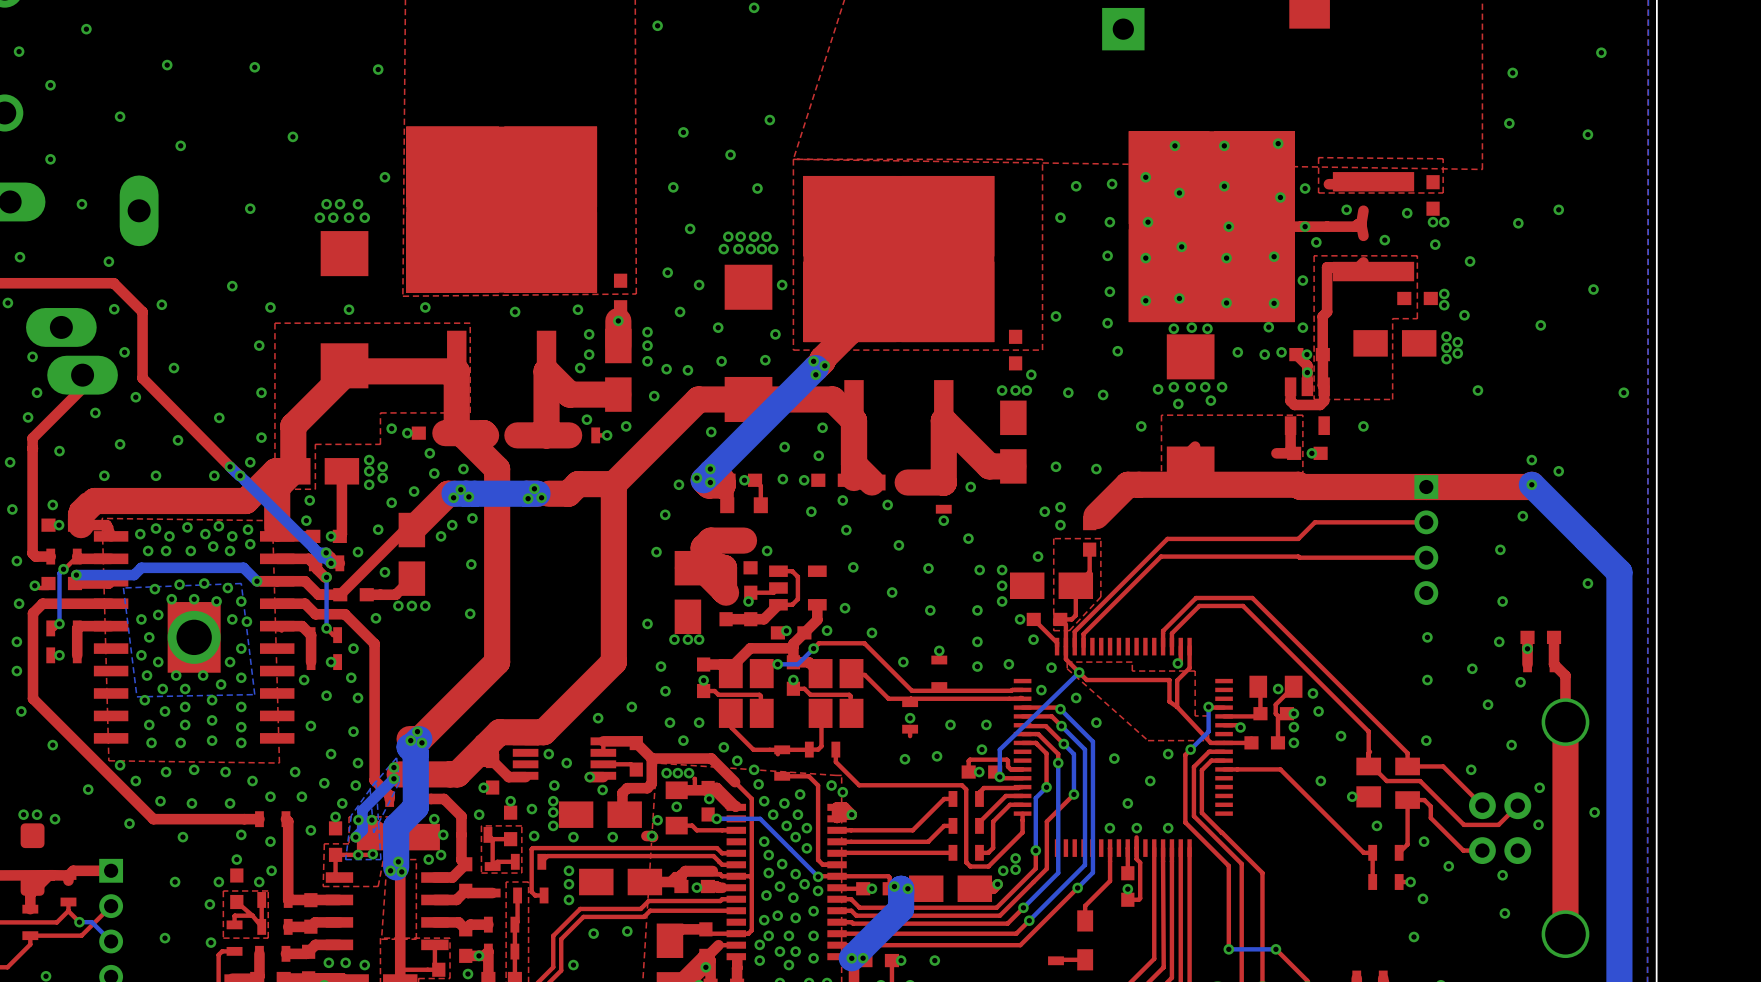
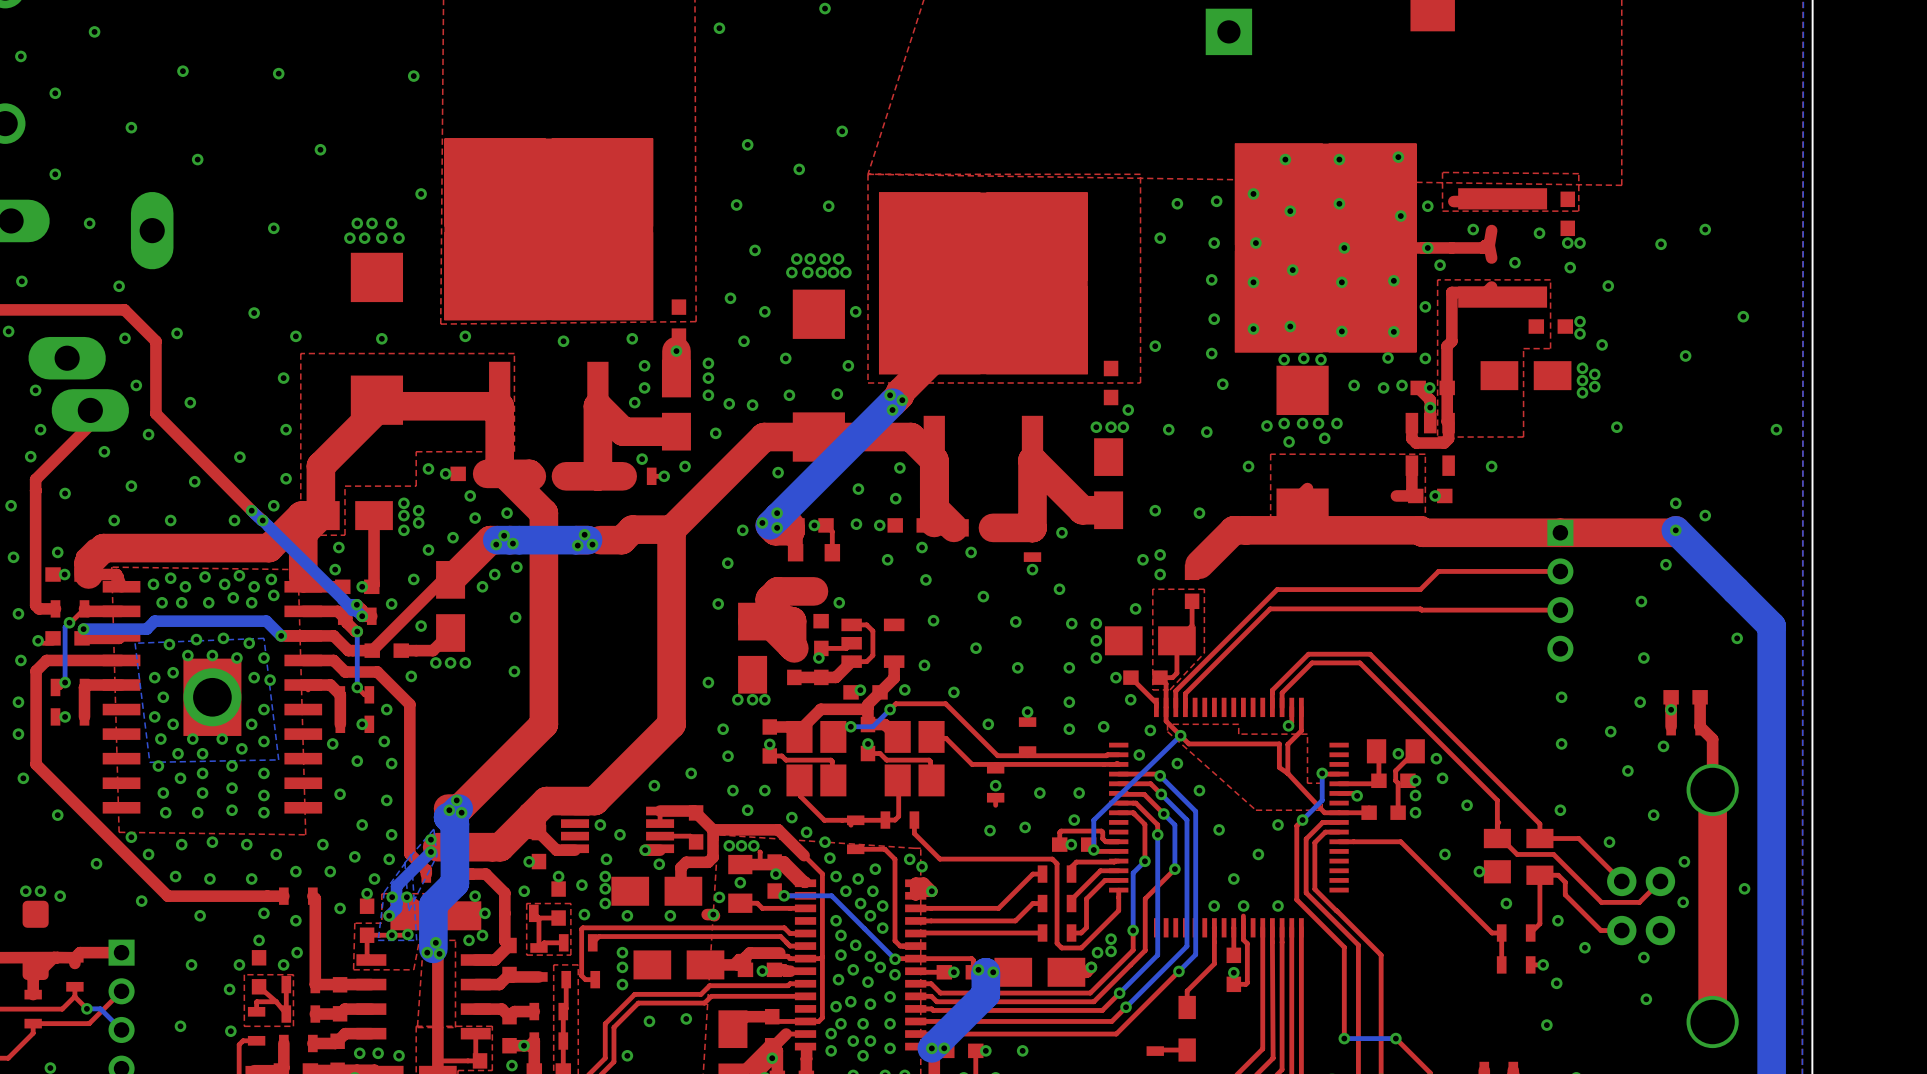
via: (1601, 52) -> none
via: (1512, 72) -> none
via: (1509, 123) -> none
via: (1587, 134) -> none

